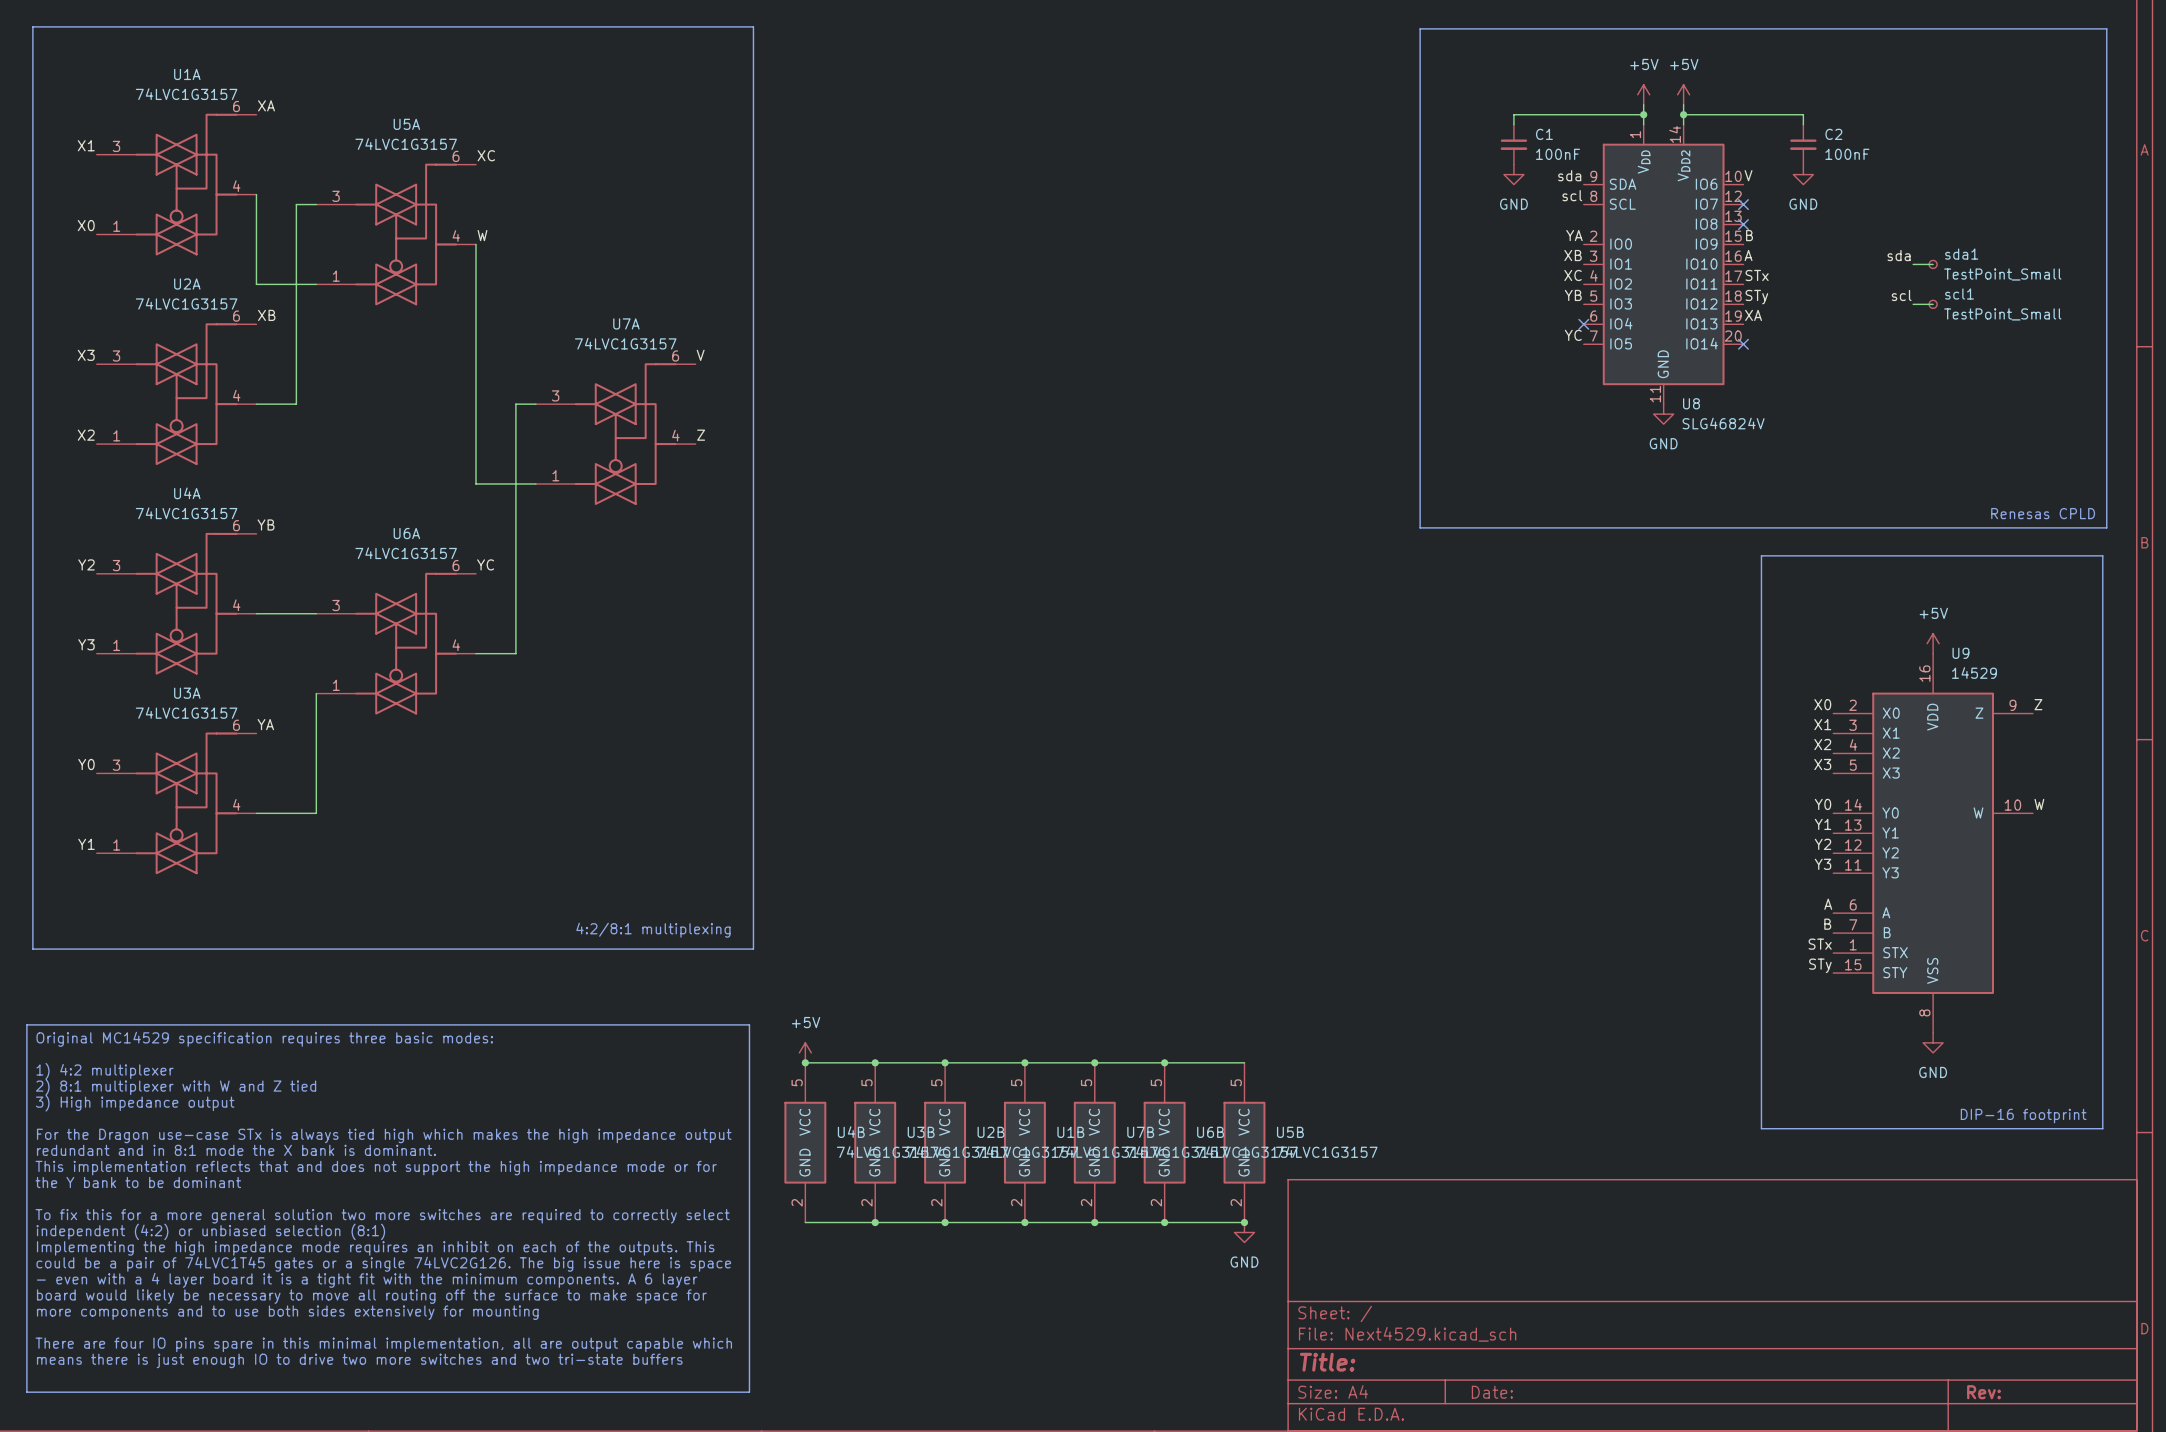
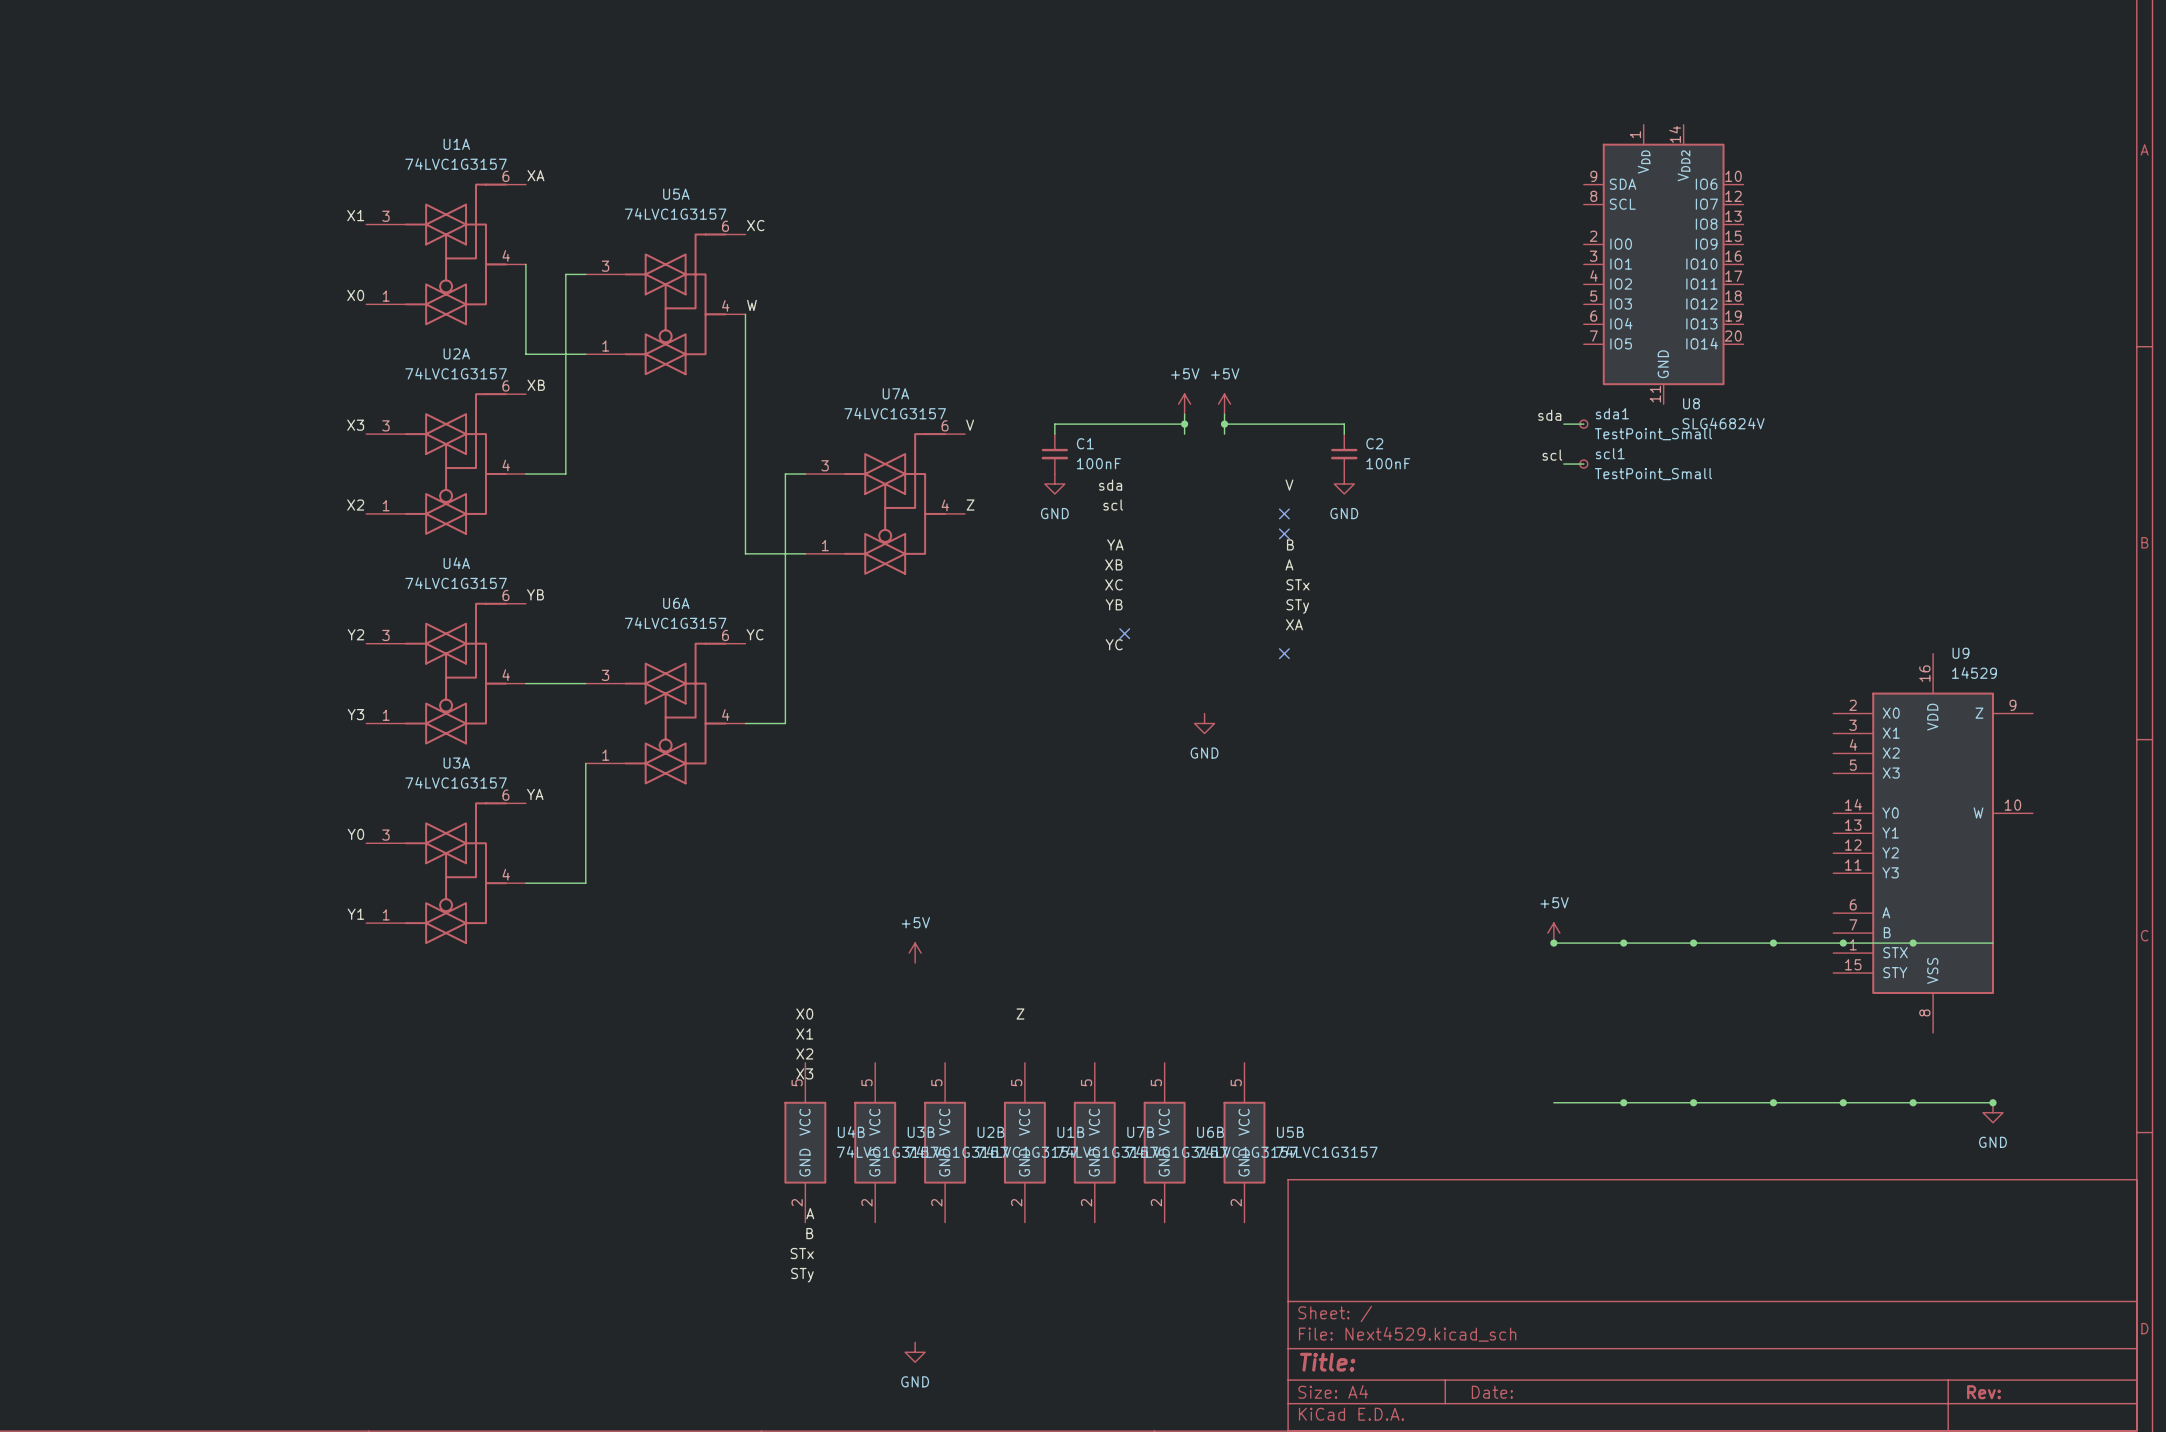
line: (32, 26) (753, 26) (753, 949) (32, 949) (32, 26) -> none
line: (1420, 28) (2106, 28) (2106, 527) (1420, 527) (1420, 28) -> none
power symbol: +5V (1643, 94) -> none
power symbol: +5V (1683, 94) -> none
wire: (1643, 104) (1643, 124) -> none
wire: (1683, 104) (1683, 124) -> none
label: XA (266, 105) -> none
wire: (1643, 114) (1513, 114) (1513, 124) -> none
junction: (1643, 114) -> none
wire: (1683, 114) (1803, 114) (1803, 124) -> none
junction: (1683, 114) -> none
C1 position: (1513, 144) -> (1054, 454)
C2 position: (1803, 144) -> (1344, 454)
label: X1 (86, 145) -> none
label: XC (486, 155) -> none
power symbol: GND (1513, 174) -> none
power symbol: GND (1803, 174) -> none
label: none -> XA (535, 175)
label: sda (1569, 175) -> none
label: V (1748, 175) -> none
U1A position: (176, 184) -> (446, 254)
wire: (256, 194) (256, 284) (316, 284) -> none
label: scl (1572, 195) -> none
wire: (316, 204) (296, 204) (296, 404) (256, 404) -> none
no-connect mark: (1743, 204) -> none
label: none -> X1 (355, 215)
no-connect mark: (1743, 224) -> none
label: X0 (86, 225) -> none
label: none -> XC (755, 225)
U5A position: (396, 234) -> (665, 304)
label: W (482, 235) -> none
label: YA (1574, 235) -> none
label: B (1749, 235) -> none
wire: (476, 244) (476, 483) (535, 483) -> none
label: XB (1573, 255) -> none
label: A (1748, 255) -> none
label: sda (1899, 255) -> none
wire: none -> (525, 264) (525, 354) (585, 354)
wire: (1913, 264) (1933, 264) -> none
sda1 position: (1933, 264) -> (1583, 424)
wire: none -> (585, 274) (565, 274) (565, 474) (525, 474)
label: XC (1573, 275) -> none
label: STx (1757, 275) -> none
label: none -> X0 (355, 295)
label: YB (1573, 295) -> none
label: scl (1901, 295) -> none
label: STy (1756, 297) -> none
wire: (1913, 304) (1933, 304) -> none
scl1 position: (1933, 304) -> (1583, 464)
label: none -> W (751, 305)
wire: none -> (745, 314) (745, 553) (805, 553)
label: XB (266, 315) -> none
label: XA (1753, 315) -> none
no-connect mark: (1583, 324) -> none
label: YC (1573, 335) -> none
no-connect mark: (1743, 344) -> none
label: X3 (86, 355) -> none
label: V (700, 355) -> none
label: none -> XB (536, 385)
U2A position: (176, 394) -> (446, 464)
wire: (535, 404) (515, 404) (515, 653) (476, 653) -> none
power symbol: none -> +5V (1184, 404)
power symbol: none -> +5V (1224, 404)
wire: none -> (1184, 414) (1184, 434)
wire: none -> (1224, 414) (1224, 434)
power symbol: GND (1663, 414) -> none
label: none -> sda (1549, 415)
wire: none -> (1184, 424) (1054, 424) (1054, 434)
junction: none -> (1184, 424)
wire: none -> (1224, 424) (1344, 424) (1344, 434)
junction: none -> (1224, 424)
wire: none -> (1563, 424) (1583, 424)
label: none -> X3 (355, 425)
label: none -> V (970, 425)
U7A position: (615, 434) -> (885, 503)
label: X2 (86, 435) -> none
label: Z (701, 435) -> none
label: none -> scl (1552, 455)
wire: none -> (1563, 464) (1583, 464)
wire: none -> (805, 474) (785, 474) (785, 723) (745, 723)
power symbol: none -> GND (1054, 483)
power symbol: none -> GND (1344, 483)
label: none -> sda (1110, 485)
label: none -> V (1289, 485)
label: none -> X2 (355, 505)
label: none -> Z (970, 505)
label: none -> scl (1113, 505)
no-connect mark: none -> (1284, 513)
text: Renesas CPLD (2043, 513) -> none
label: YB (266, 524) -> none
no-connect mark: none -> (1284, 533)
label: none -> YA (1115, 544)
label: none -> B (1290, 544)
line: (1761, 555) (2102, 555) (2102, 1128) (1761, 1128) (1761, 555) -> none
label: Y2 (86, 564) -> none
label: YC (485, 564) -> none
label: none -> XB (1113, 564)
label: none -> A (1289, 564)
label: none -> XC (1113, 584)
label: none -> STx (1298, 584)
label: none -> YB (535, 594)
U4A position: (176, 603) -> (446, 673)
label: none -> YB (1114, 604)
label: none -> STy (1297, 606)
wire: (256, 613) (316, 613) -> none
label: none -> XA (1294, 624)
no-connect mark: none -> (1124, 633)
label: none -> Y2 (355, 634)
label: none -> YC (755, 634)
U6A position: (396, 643) -> (665, 713)
power symbol: +5V (1933, 643) -> none
label: Y3 (86, 644) -> none
label: none -> YC (1114, 644)
no-connect mark: none -> (1284, 653)
wire: none -> (525, 683) (585, 683)
wire: (316, 693) (316, 813) (256, 813) -> none
label: X0 (1822, 704) -> none
label: Z (2038, 704) -> none
label: none -> Y3 (355, 714)
power symbol: none -> GND (1204, 723)
label: YA (265, 724) -> none
label: X1 (1822, 724) -> none
label: X2 (1822, 744) -> none
wire: none -> (585, 763) (585, 883) (525, 883)
label: Y0 (86, 764) -> none
label: X3 (1822, 764) -> none
label: none -> YA (535, 794)
U3A position: (176, 803) -> (446, 873)
label: Y0 (1823, 804) -> none
label: W (2039, 804) -> none
label: Y1 (1823, 824) -> none
label: none -> Y0 (355, 834)
label: Y1 (86, 844) -> none
label: Y2 (1823, 844) -> none
label: Y3 (1823, 864) -> none
label: A (1828, 904) -> none
label: none -> Y1 (355, 914)
label: B (1827, 924) -> none
text: 4:2/8:1 multiplexing (653, 930) -> none
power symbol: none -> +5V (1553, 933)
wire: none -> (1553, 943) (1992, 943)
junction: none -> (1553, 943)
junction: none -> (1623, 943)
junction: none -> (1693, 943)
junction: none -> (1773, 943)
junction: none -> (1843, 943)
junction: none -> (1913, 943)
label: STx (1820, 944) -> none
label: STy (1820, 965) -> none
label: none -> X0 (804, 1014)
label: none -> Z (1020, 1014)
line: (26, 1024) (749, 1024) (749, 1392) (26, 1392) (26, 1024) -> none
label: none -> X1 (804, 1033)
text: Original MC14529 specification requires three basic modes: (264, 1039) -> none
power symbol position: GND (1933, 1042) -> GND (1992, 1112)
power symbol position: +5V (805, 1052) -> +5V (915, 953)
label: none -> X2 (804, 1053)
wire: (805, 1062) (1244, 1062) -> none
junction: (805, 1062) -> none
junction: (875, 1062) -> none
junction: (945, 1062) -> none
junction: (1024, 1062) -> none
junction: (1094, 1062) -> none
junction: (1164, 1062) -> none
text: 1) 4:2 multiplexer (105, 1071) -> none
label: none -> X3 (804, 1073)
text: 2) 8:1 multiplexer with W and Z tied (176, 1087) -> none
wire: none -> (1553, 1102) (1992, 1102)
junction: none -> (1623, 1102)
junction: none -> (1693, 1102)
junction: none -> (1773, 1102)
junction: none -> (1843, 1102)
junction: none -> (1913, 1102)
junction: none -> (1992, 1102)
text: 3) High impedance output (135, 1103) -> none
text: DIP-16 footprint (2023, 1116) -> none
text: For the Dragon use-case STx is always tied high which makes the high impedance output (384, 1135) -> none
text: redundant and in 8:1 mode the X bank is dominant. (236, 1150) -> none
text: This implementation reflects that and does not support the high impedance mode or for (376, 1168) -> none
text: the Y bank to be dominant (138, 1182) -> none
label: none -> A (810, 1213)
text: To fix this for a more general solution two more switches are required to correctly select (382, 1216) -> none
wire: (805, 1222) (1244, 1222) -> none
junction: (875, 1222) -> none
junction: (945, 1222) -> none
junction: (1024, 1222) -> none
junction: (1094, 1222) -> none
junction: (1164, 1222) -> none
junction: (1244, 1222) -> none
text: independent (4:2) or unbiased selection (8:1) (210, 1231) -> none
power symbol: GND (1244, 1232) -> none
label: none -> B (809, 1233)
text: Implementing the high impedance mode requires an inhibit on each of the outputs. This (375, 1248) -> none
label: none -> STx (802, 1253)
text: could be a pair of 74LVC1T45 gates or a single 74LVC2G126. The big issue here is space (383, 1264) -> none
label: none -> STy (802, 1275)
text: - even with a 4 layer board it is a tight fit with the minimum components. A 6 layer (367, 1280) -> none
text: board would likely be necessary to move all routing off the surface to make space for (371, 1296) -> none
text: more components and to use both sides extensively for mounting (287, 1312) -> none
text: There are four IO pins spare in this minimal implementation, all are output capable which (383, 1344) -> none
power symbol: none -> GND (915, 1352)
text: means there is just enough IO to drive two more switches and two tri-state buffers (359, 1360) -> none

